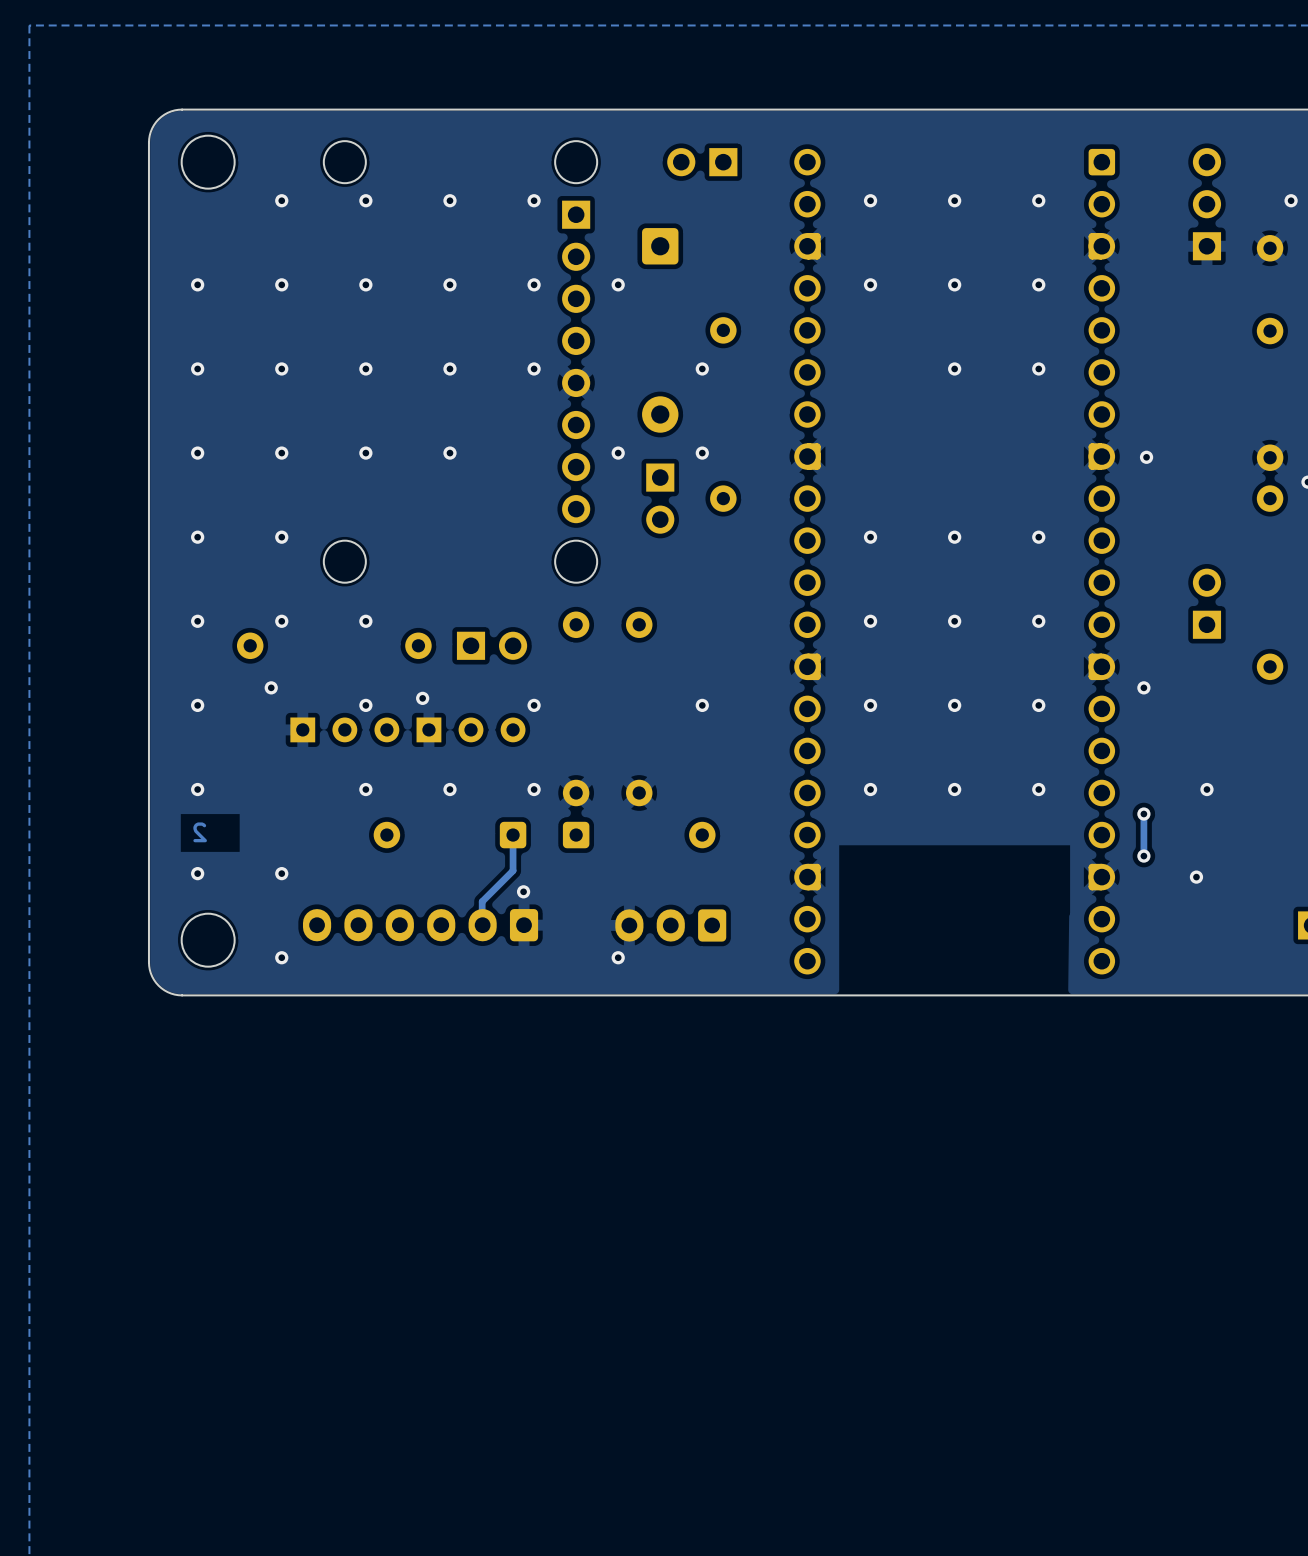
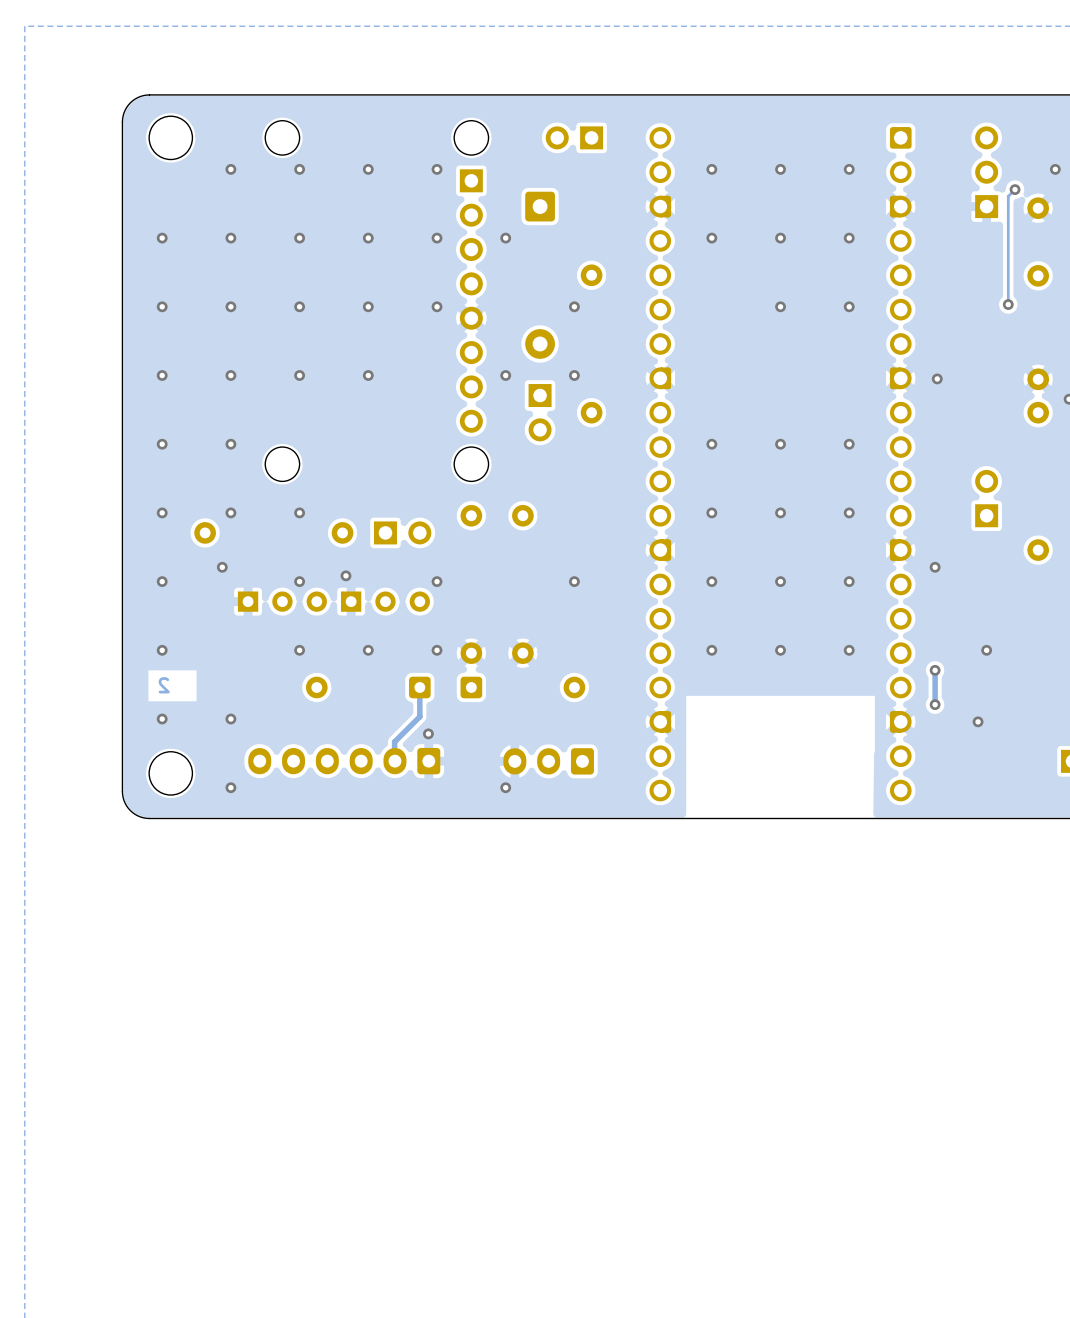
track: none -> (1015, 189) (1008, 196) (1008, 304)
via: none -> (1015, 189)
via: none -> (1008, 304)

